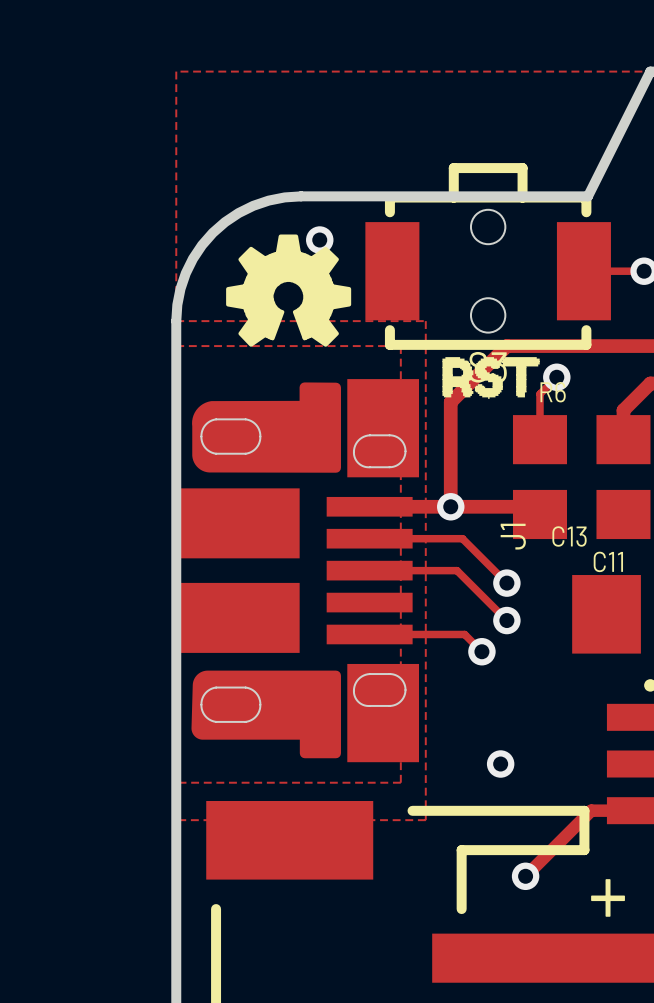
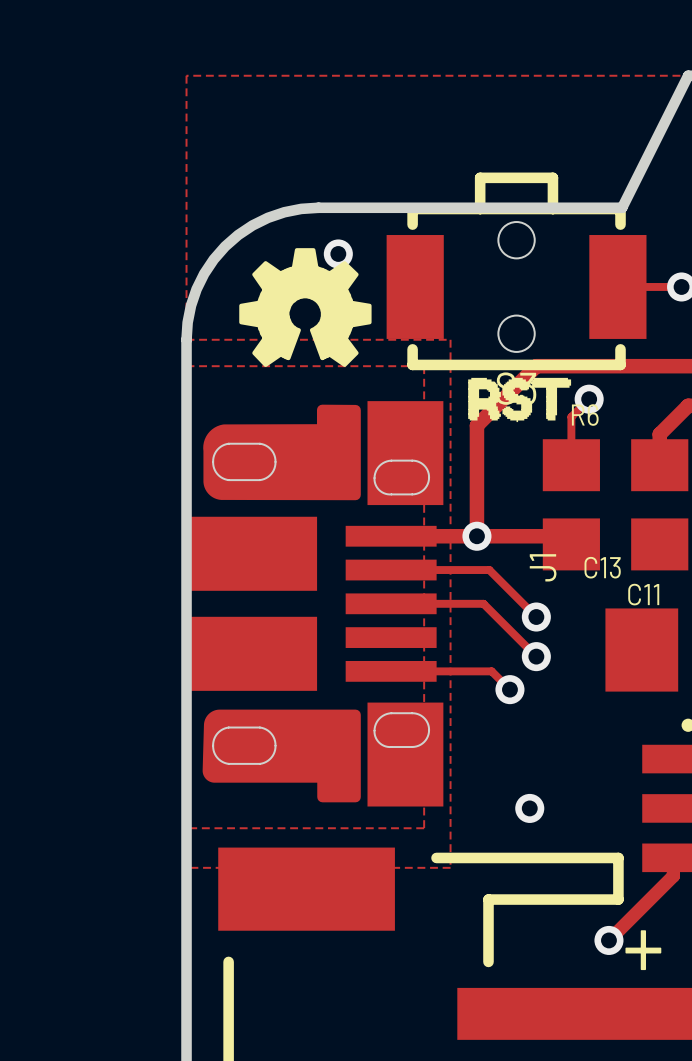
track: (636, 810) (591, 810) (525, 876) -> (673, 857) (673, 876) (608, 940)
via position: (525, 876) -> (608, 940)

